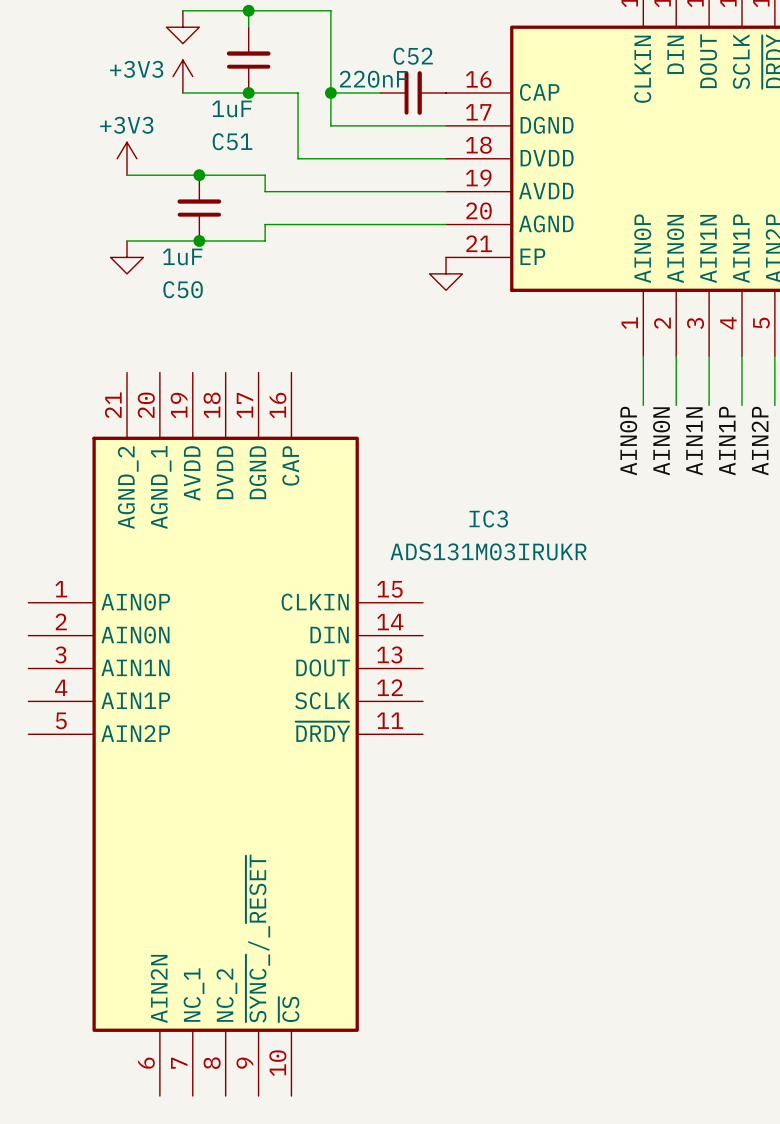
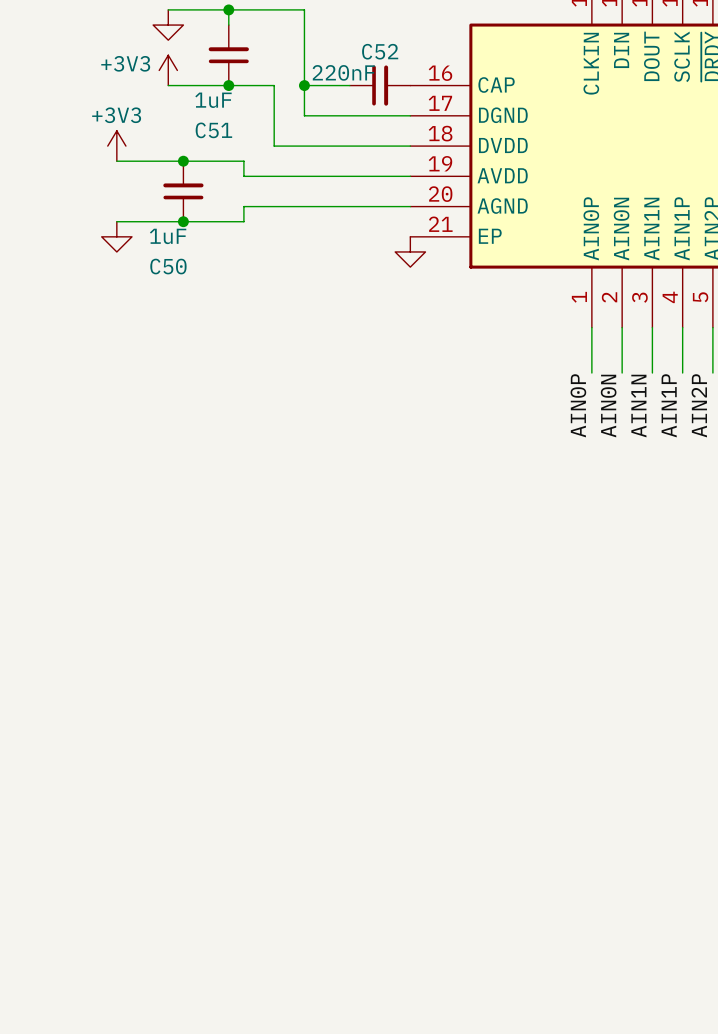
IC3: ADS131M03IRUKR (225, 734) -> none

